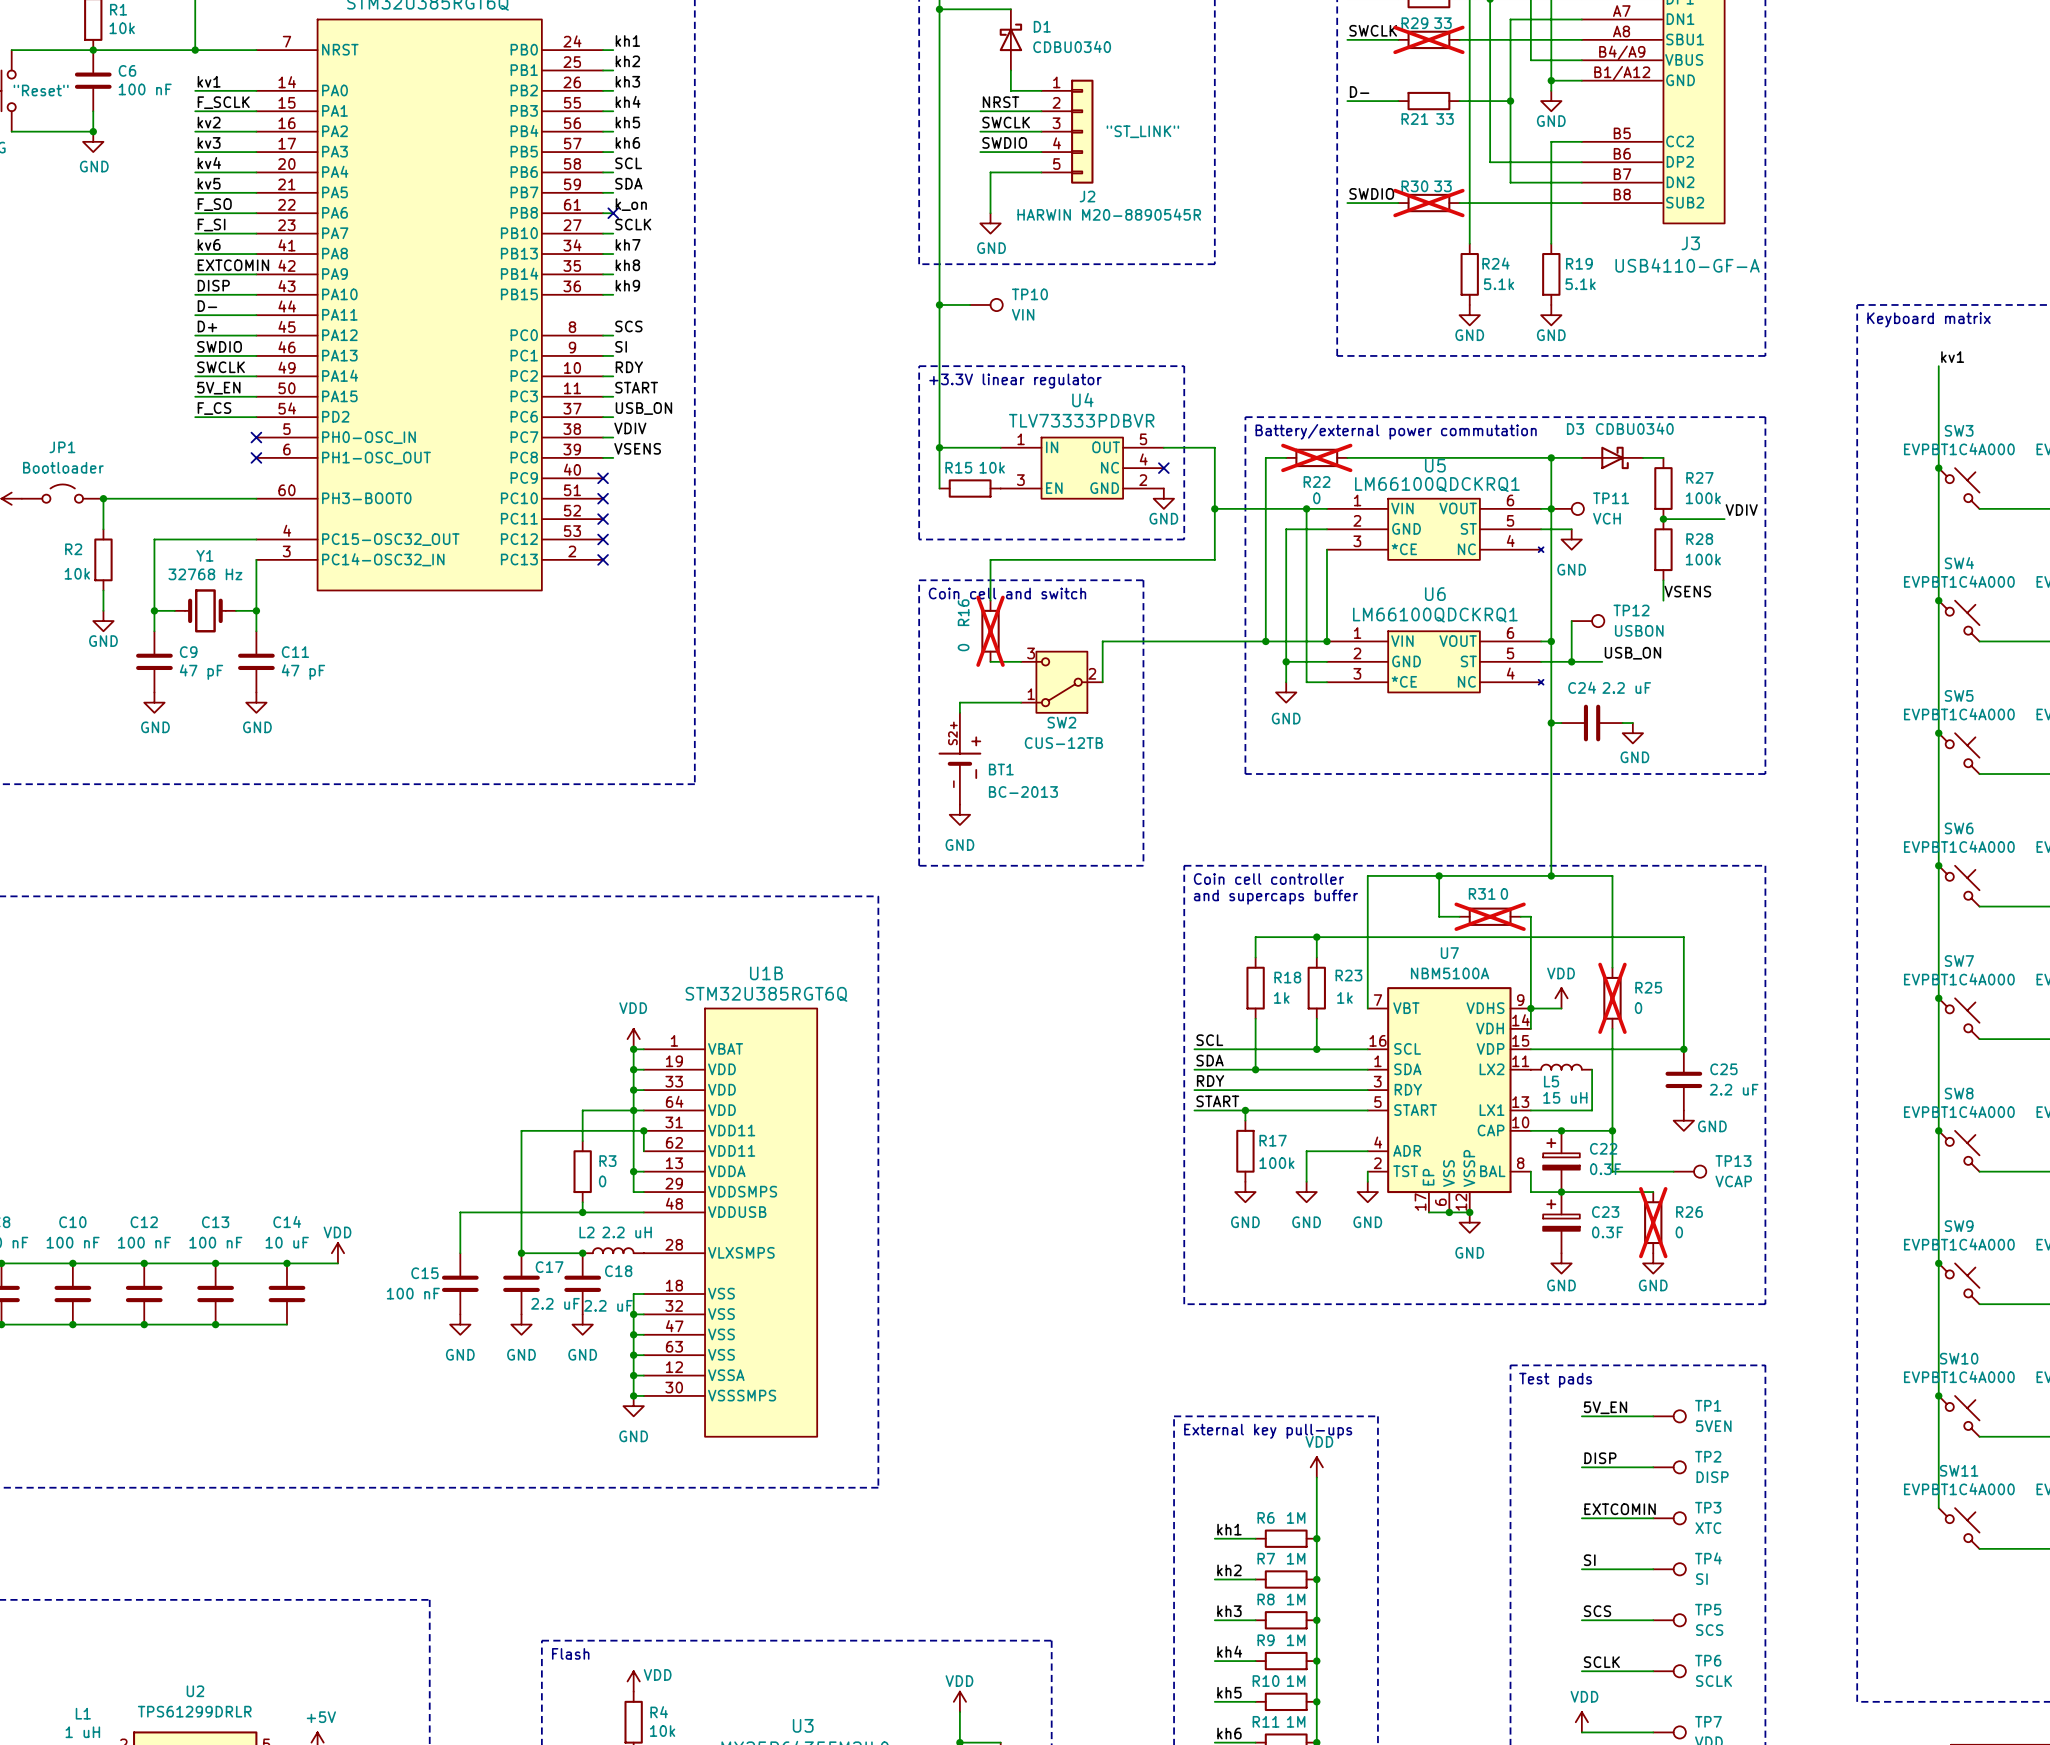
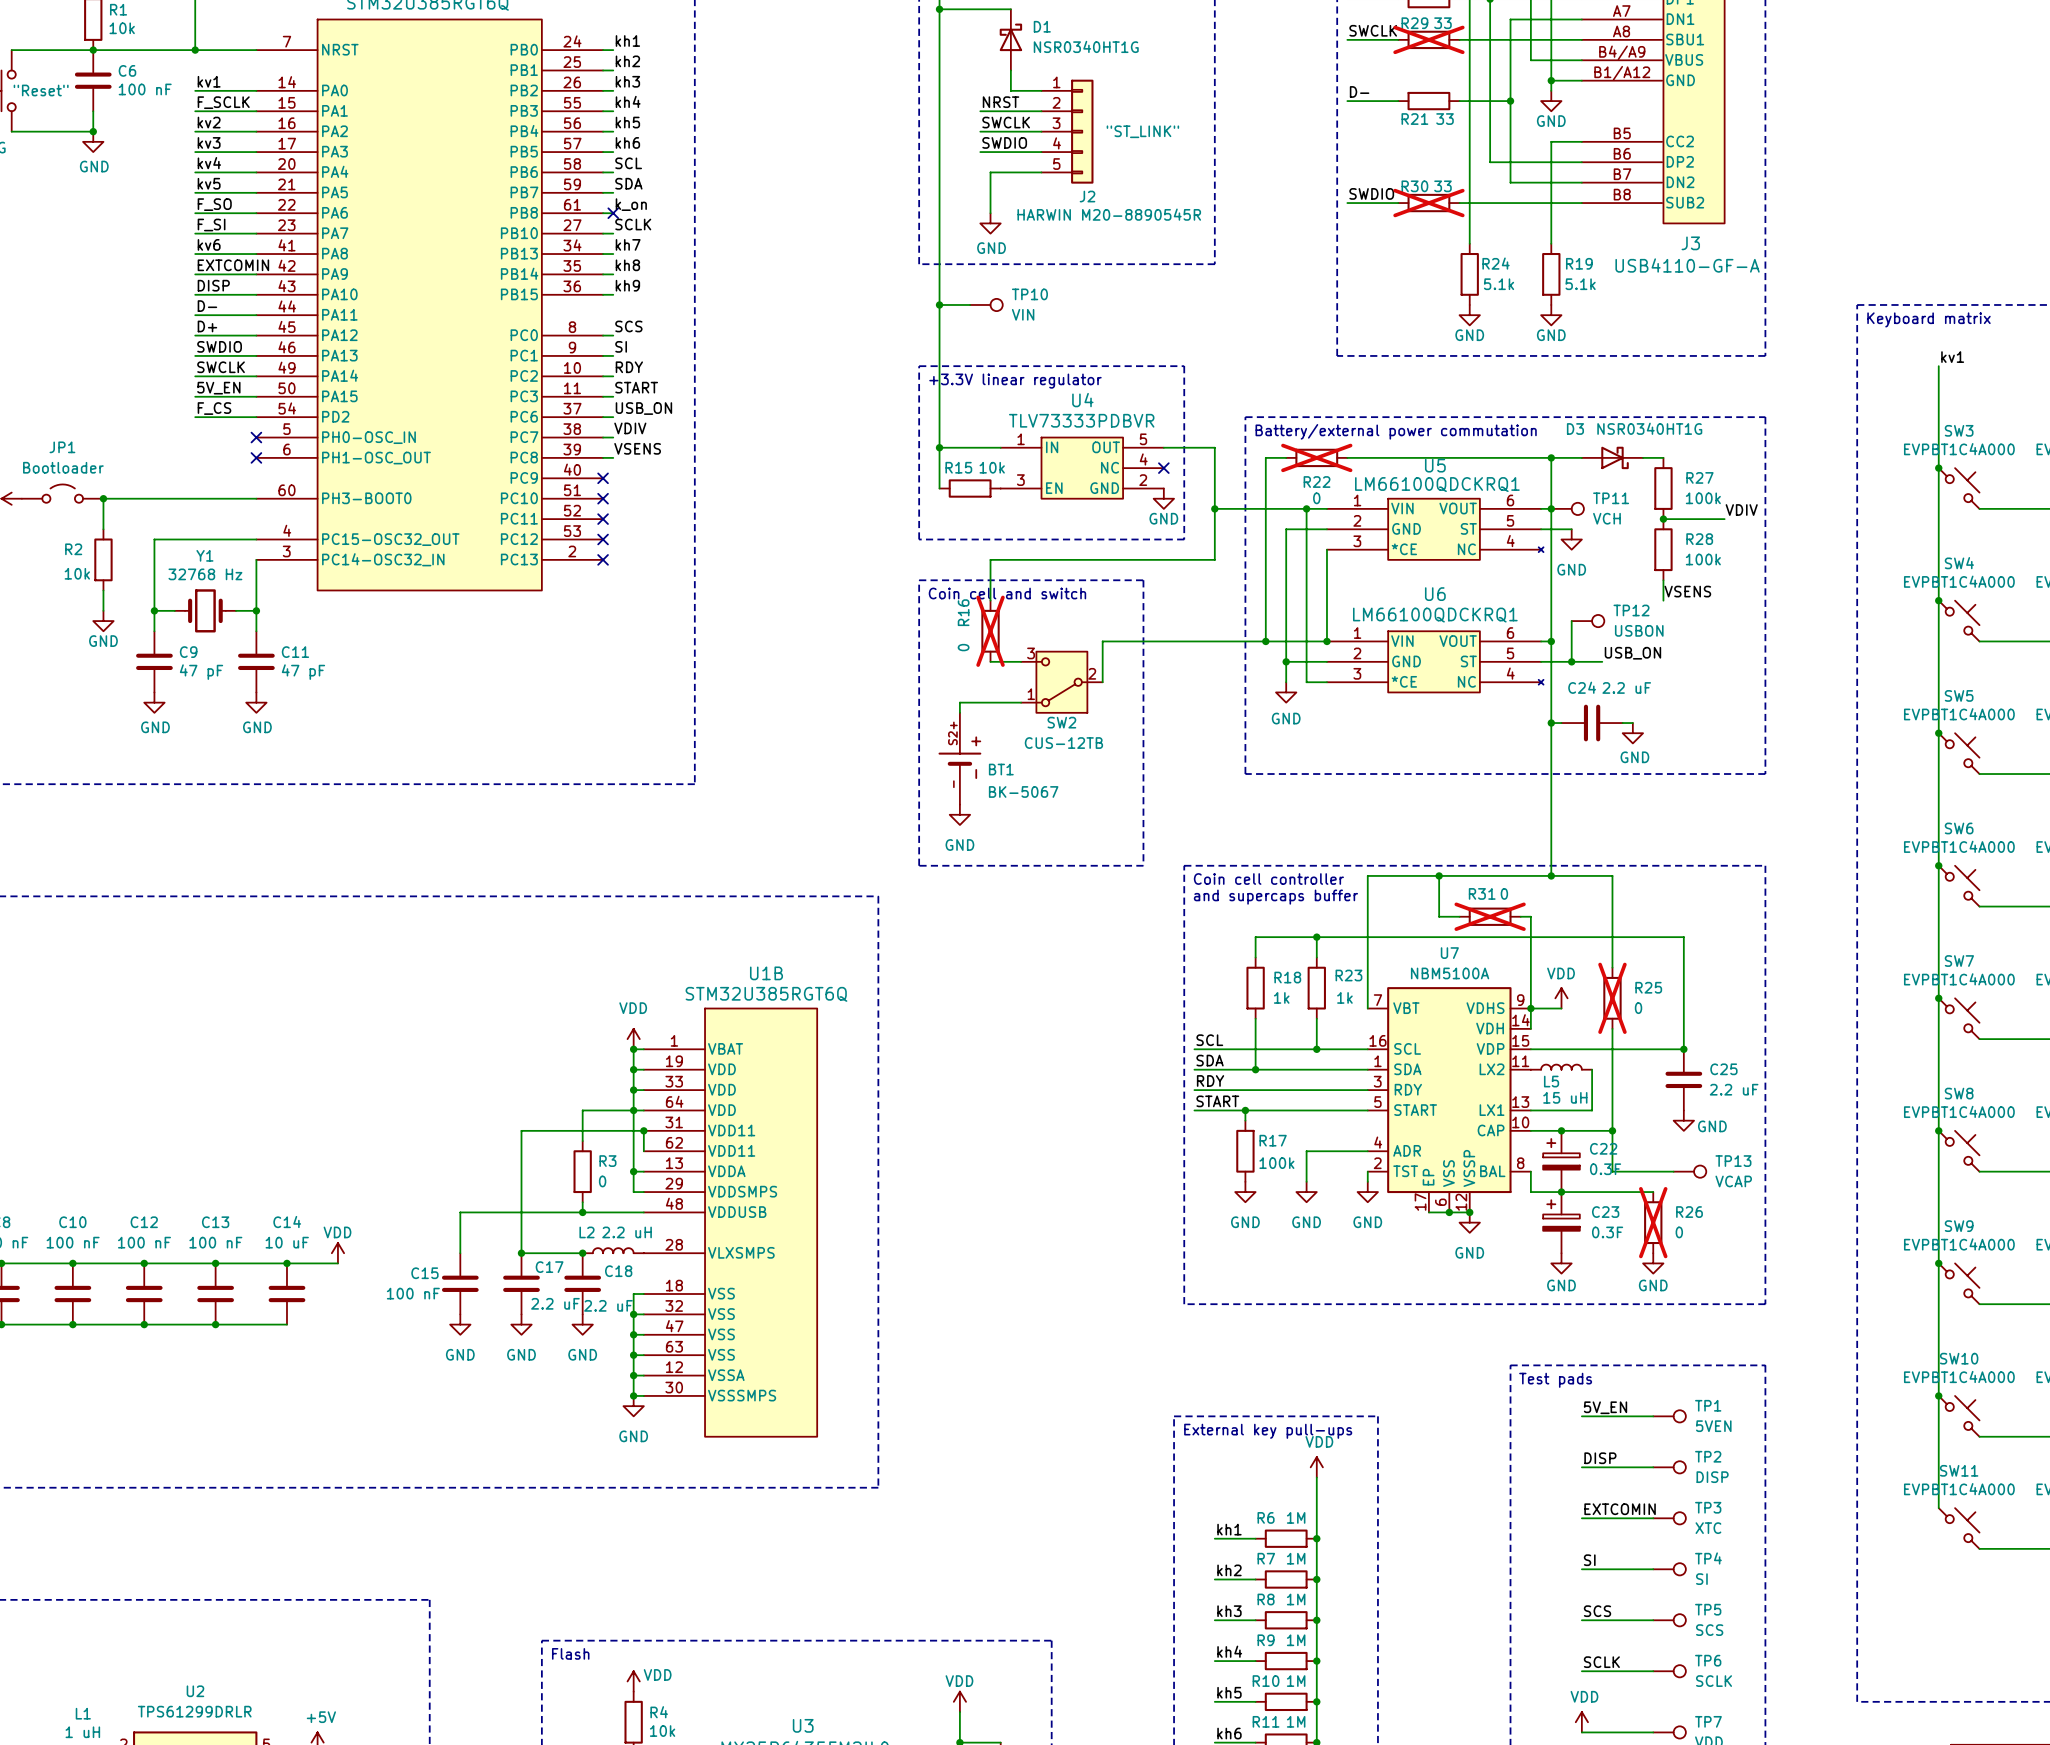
D1 value: CDBU0340 (1072, 46) -> NSR0340HT1G (1086, 46)
D3 value: CDBU0340 (1634, 428) -> NSR0340HT1G (1649, 428)
BT1 value: BC-2013 (1023, 791) -> BK-5067 (1023, 791)

